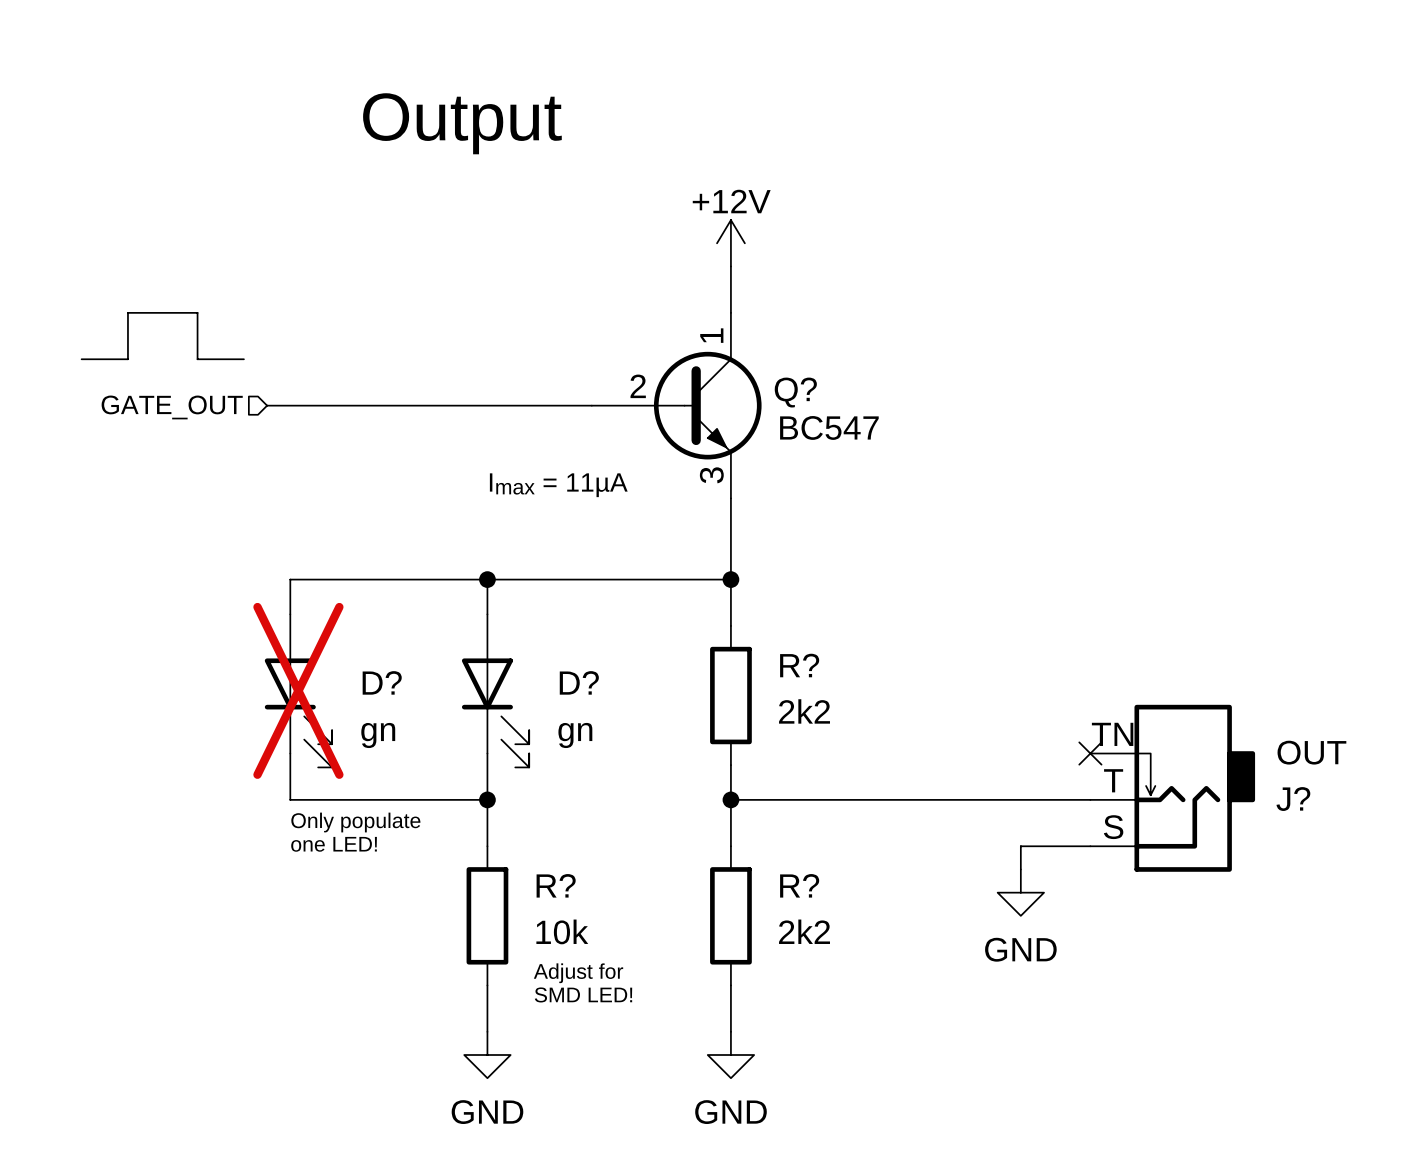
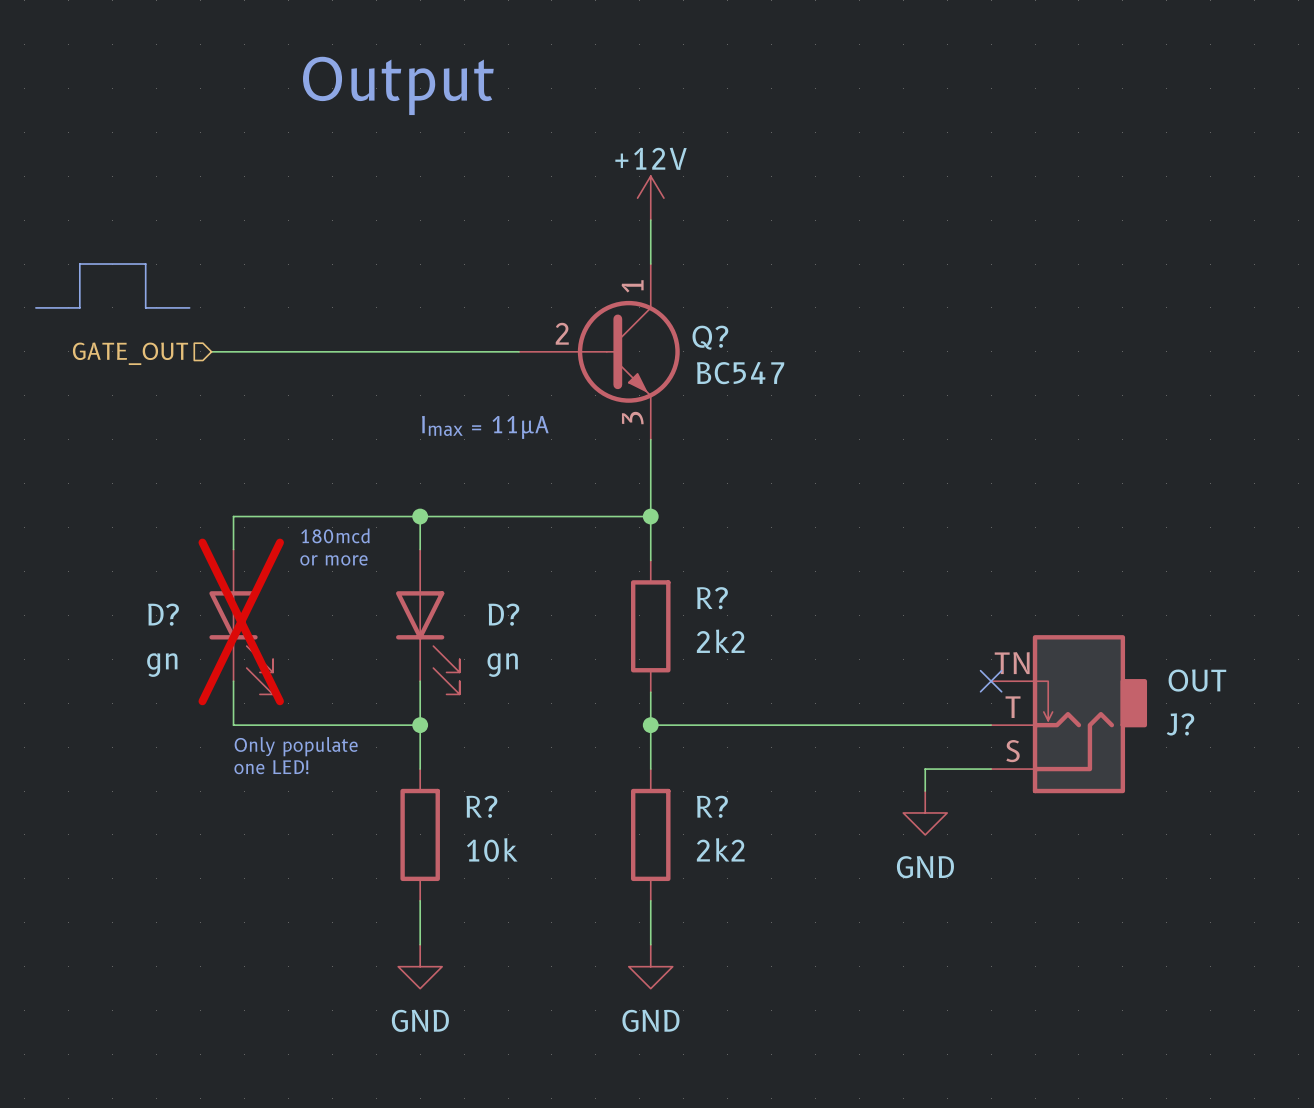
text: none -> 180mcd (335, 535)
text: none -> or more (333, 560)
D? name position: D? (382, 682) -> D? (163, 614)
D? value position: gn (378, 735) -> gn (162, 665)
text: Adjust for (578, 973) -> none
text: SMD LED! (583, 994) -> none

